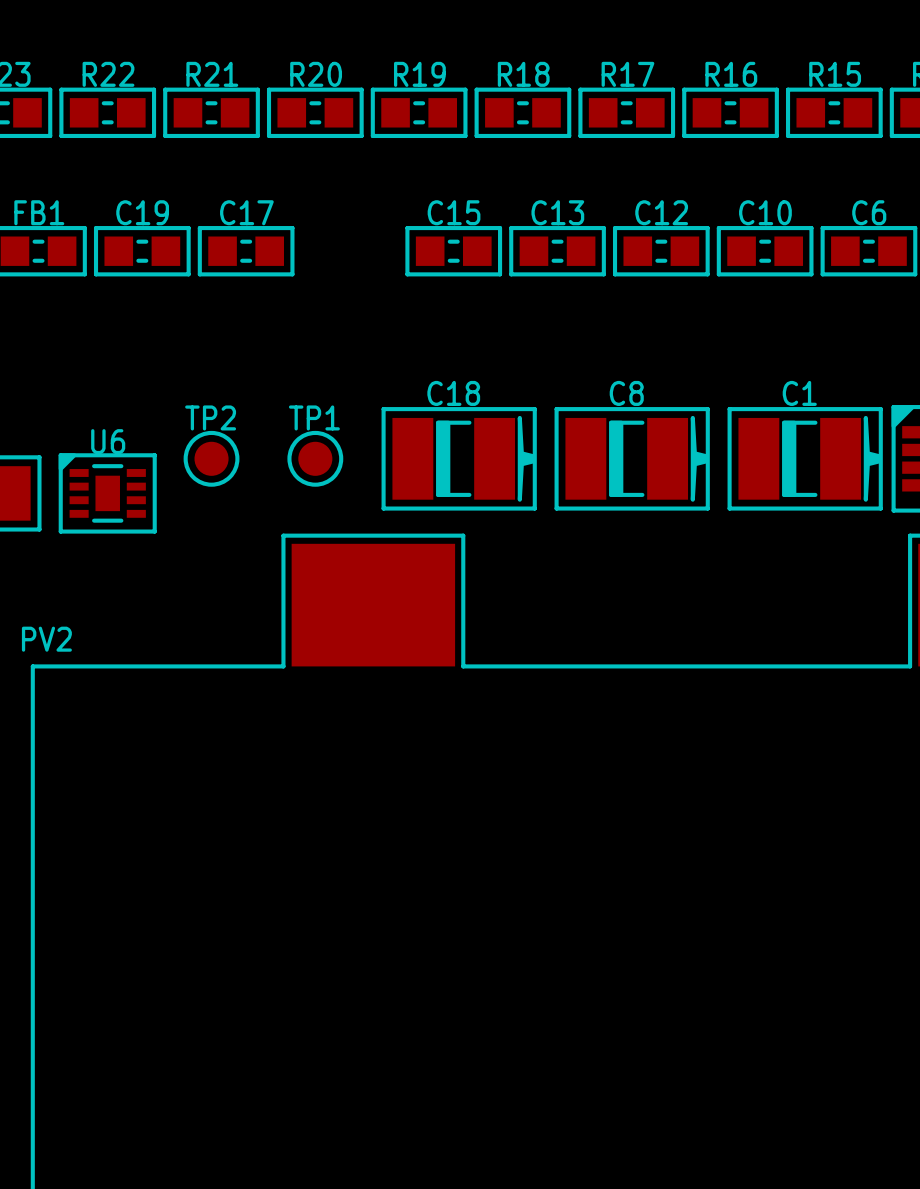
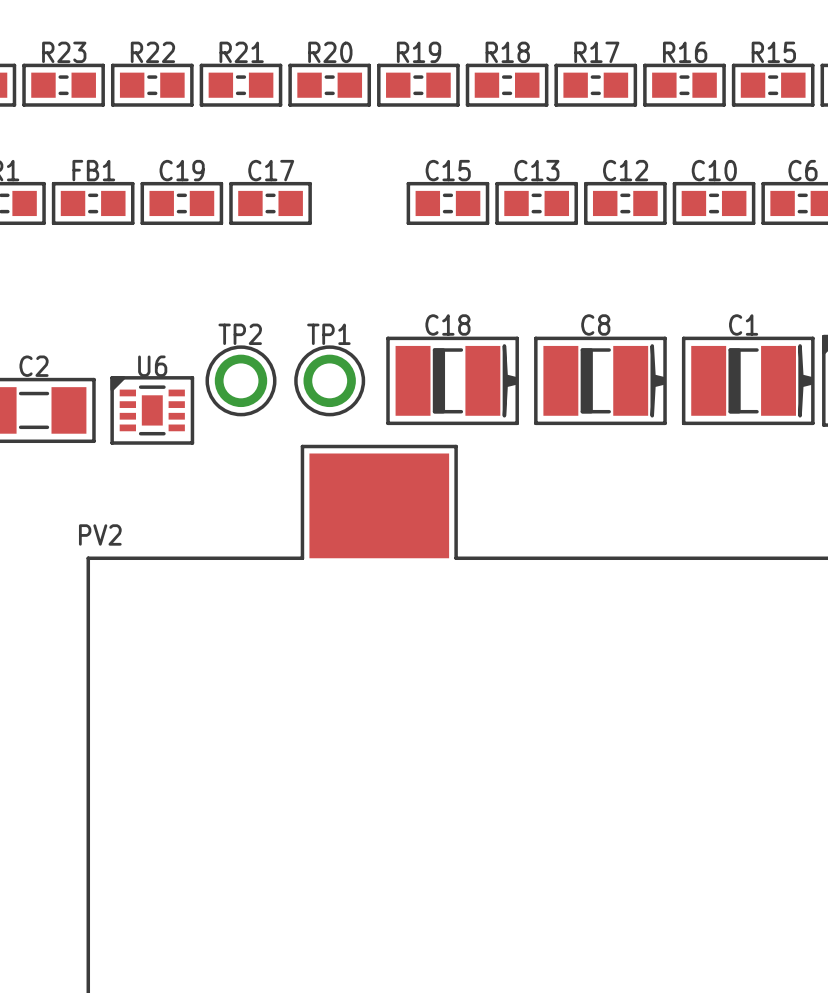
TP2 footprint: [183, 430, 240, 487] -> [205, 345, 277, 417]
TP1 footprint: [287, 430, 344, 487] -> [294, 345, 366, 417]

